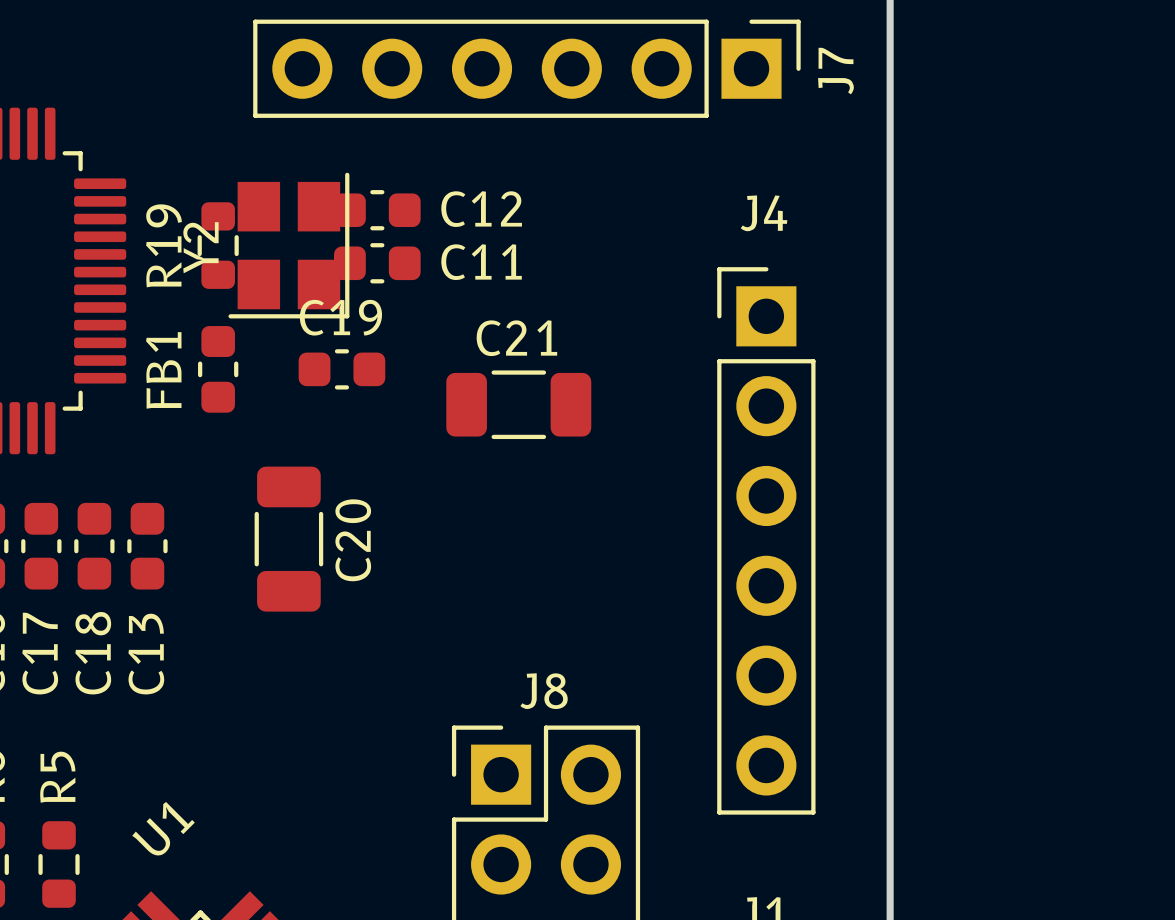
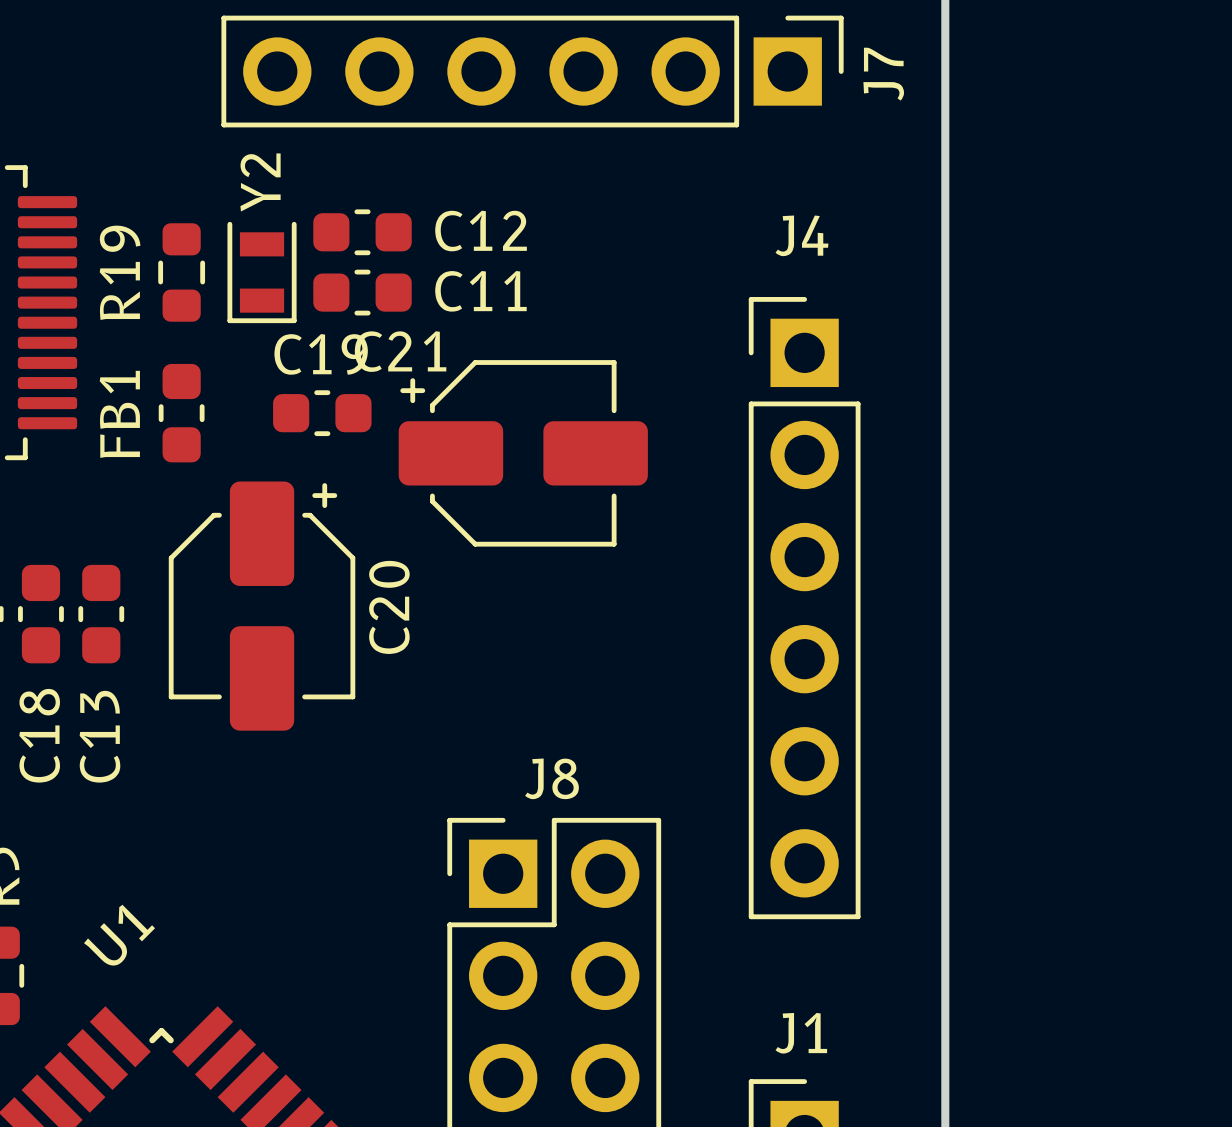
Y2 footprint: [228, 172, 350, 319] -> [227, 221, 297, 324]
Y2 name position: Y2 (200, 247) -> Y2 (260, 182)
C21 name position: C21 (516, 338) -> C21 (400, 351)
C21 footprint: [446, 370, 592, 440] -> [398, 360, 648, 547]
C20 footprint: [254, 466, 324, 612] -> [168, 481, 356, 731]

